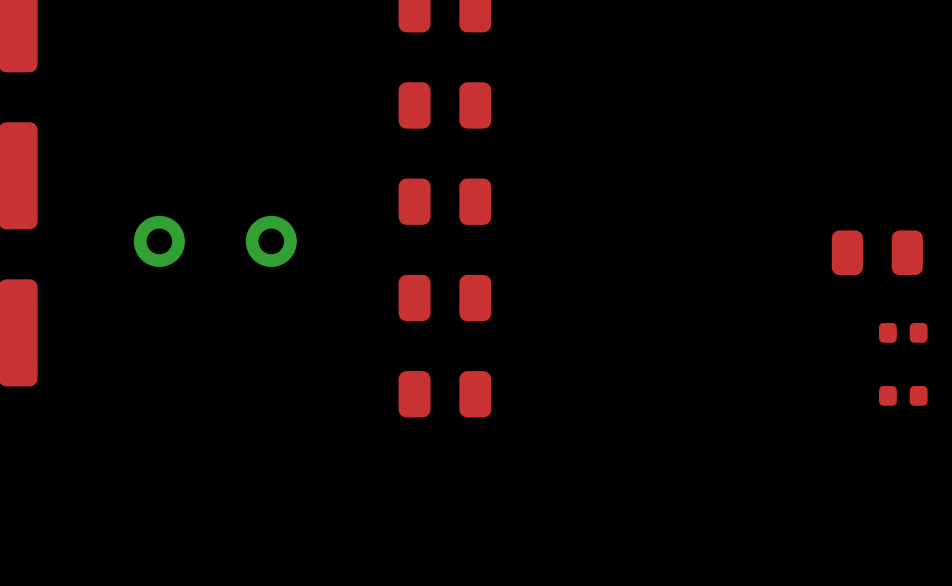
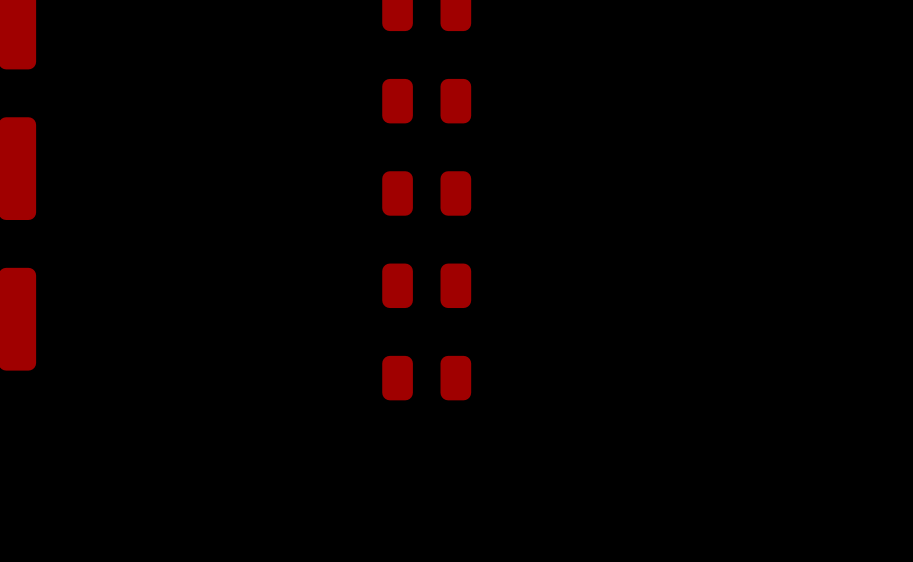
part: (215, 241) -> none
part: (877, 252) -> none
part: (903, 332) -> none
part: (903, 395) -> none

